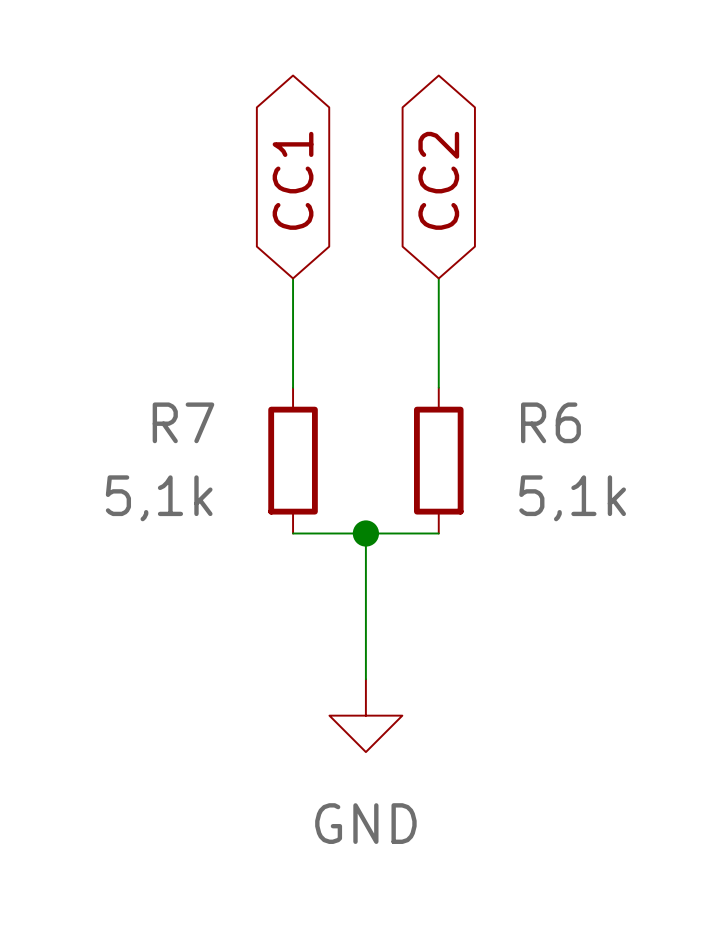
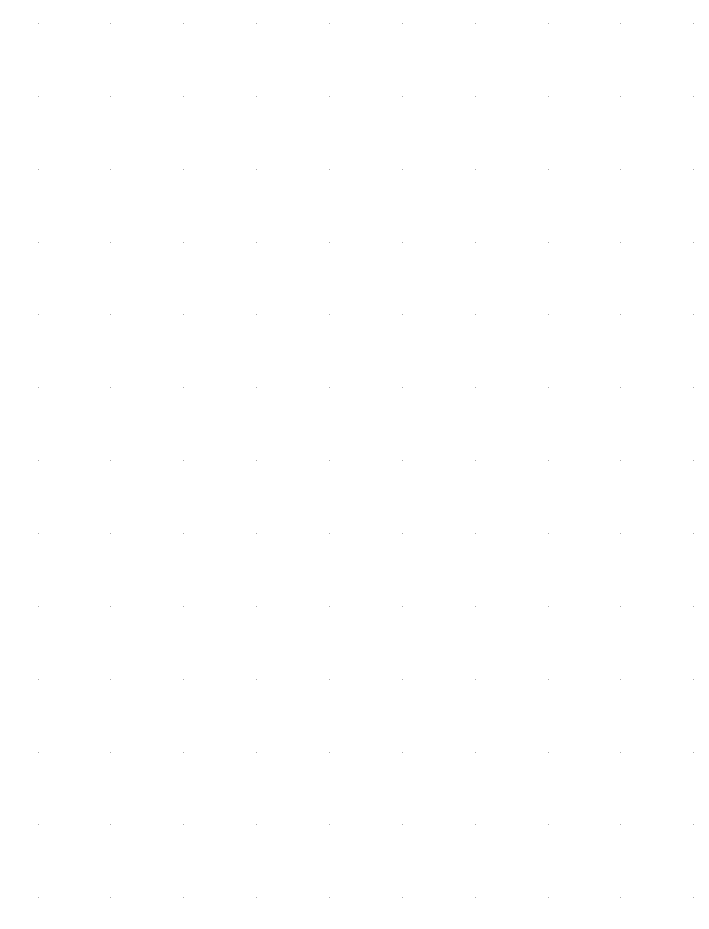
global label: CC1 (293, 180) -> none
global label: CC2 (438, 180) -> none
wire: (293, 278) (293, 387) -> none
wire: (438, 278) (438, 387) -> none
R7: 5,1k (293, 460) -> none
R6: 5,1k (438, 460) -> none
wire: (293, 533) (438, 533) -> none
wire: (365, 533) (365, 679) -> none
junction: (365, 533) -> none
power symbol: GND (365, 715) -> none

